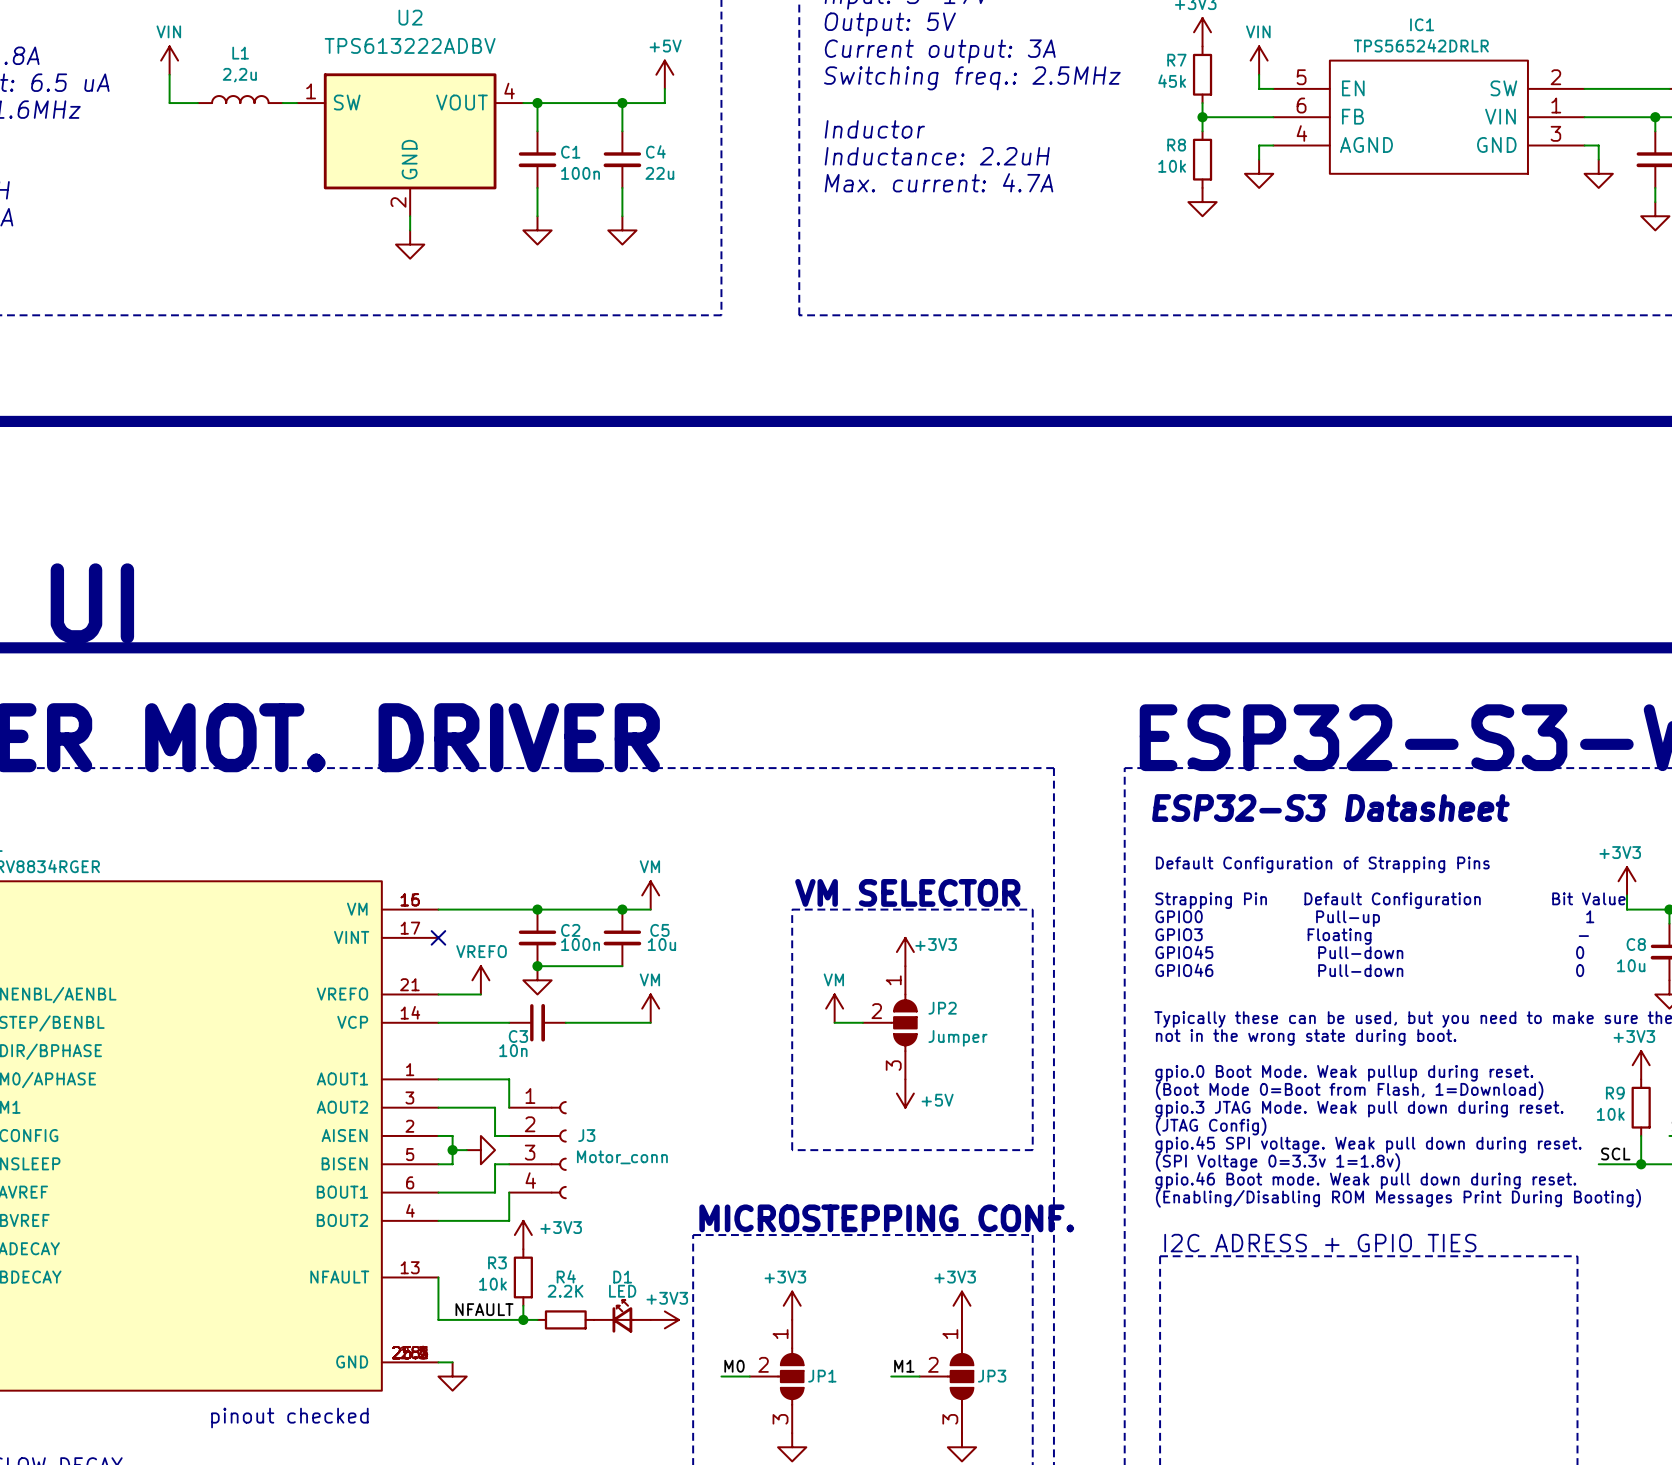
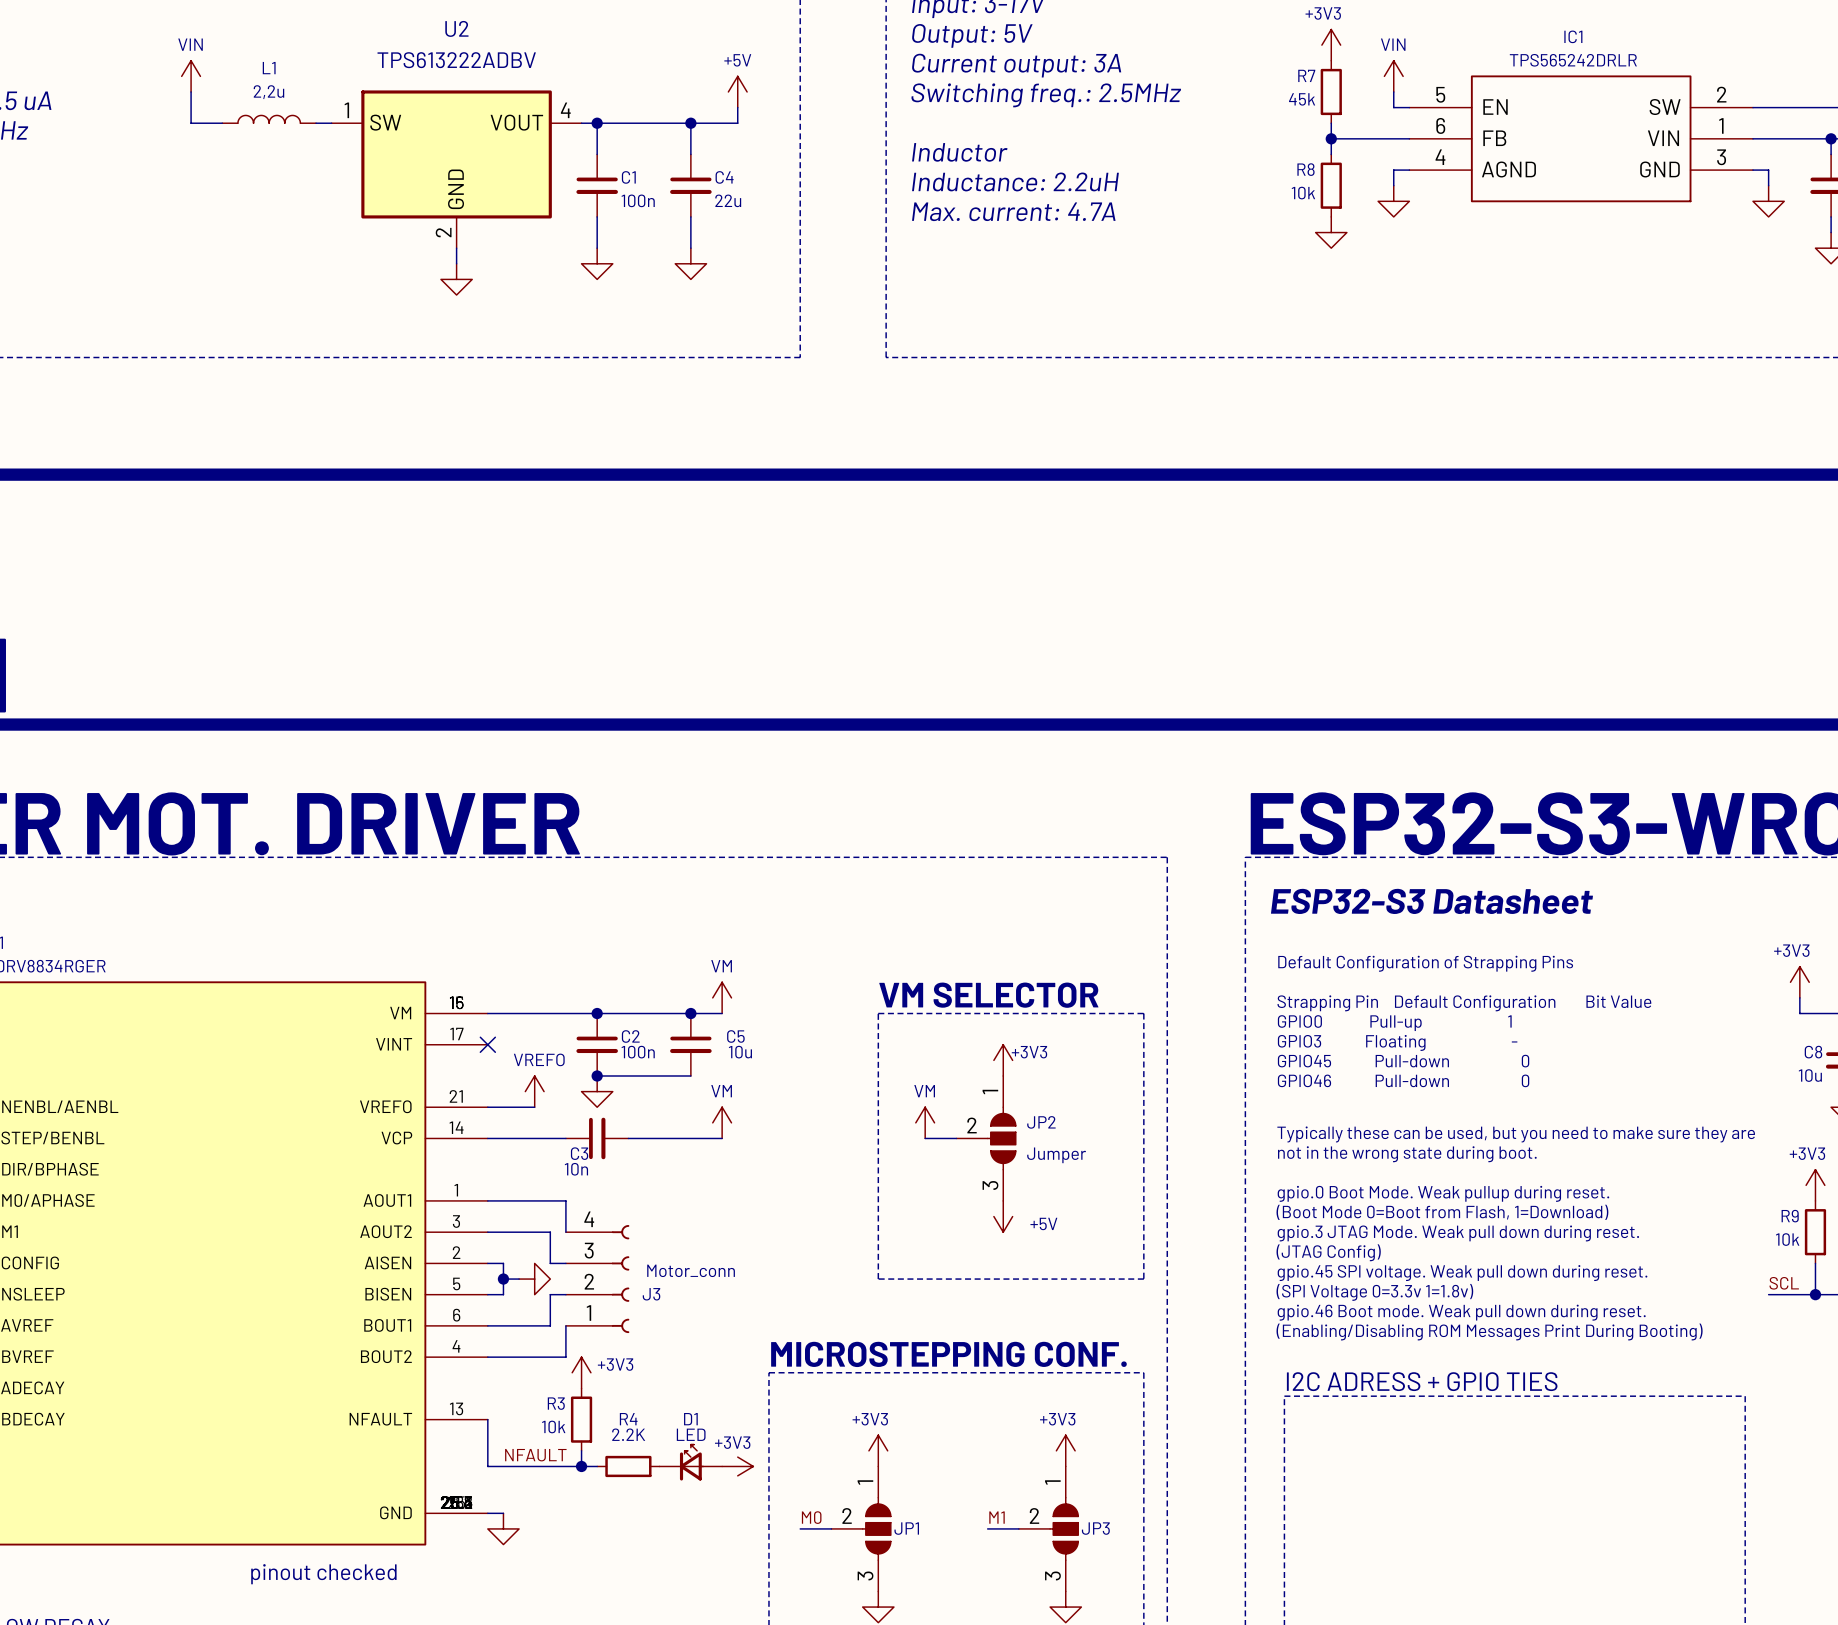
J3 flip: as is (558, 1150) -> up-down (620, 1279)

